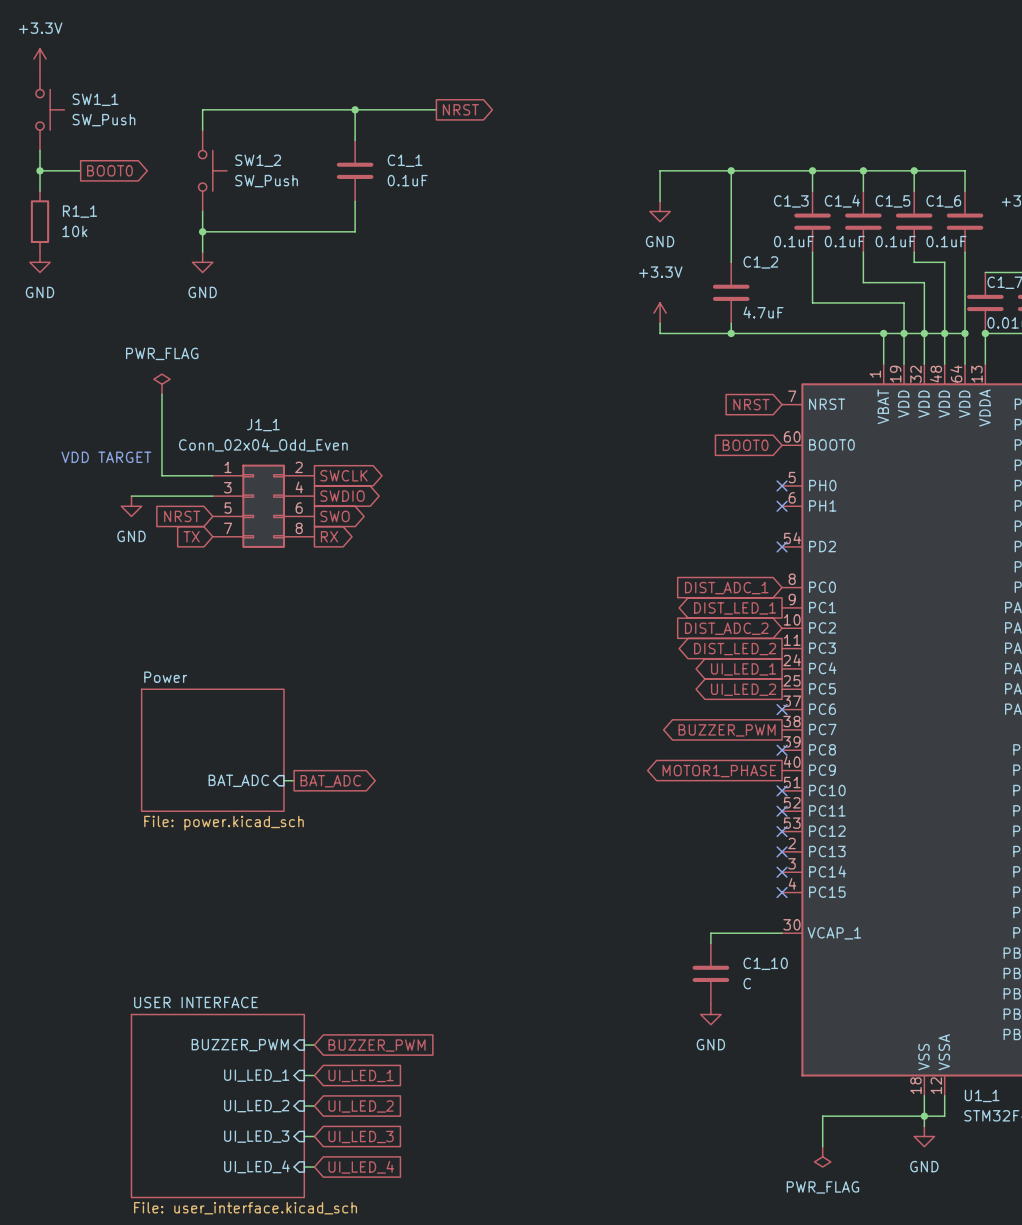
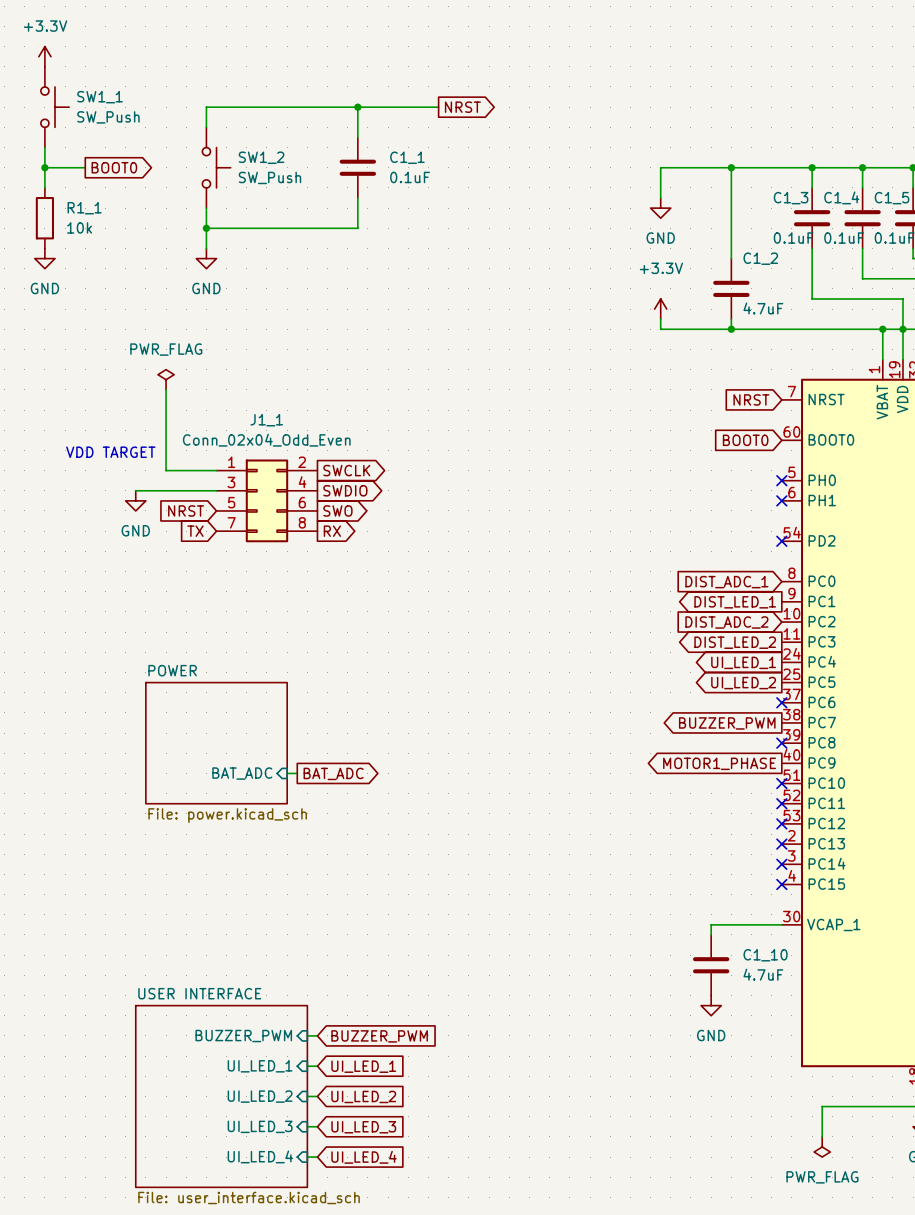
sheet Power name: Power (165, 677) -> POWER (172, 670)
C1_10 value: C (747, 983) -> 4.7uF (763, 974)

